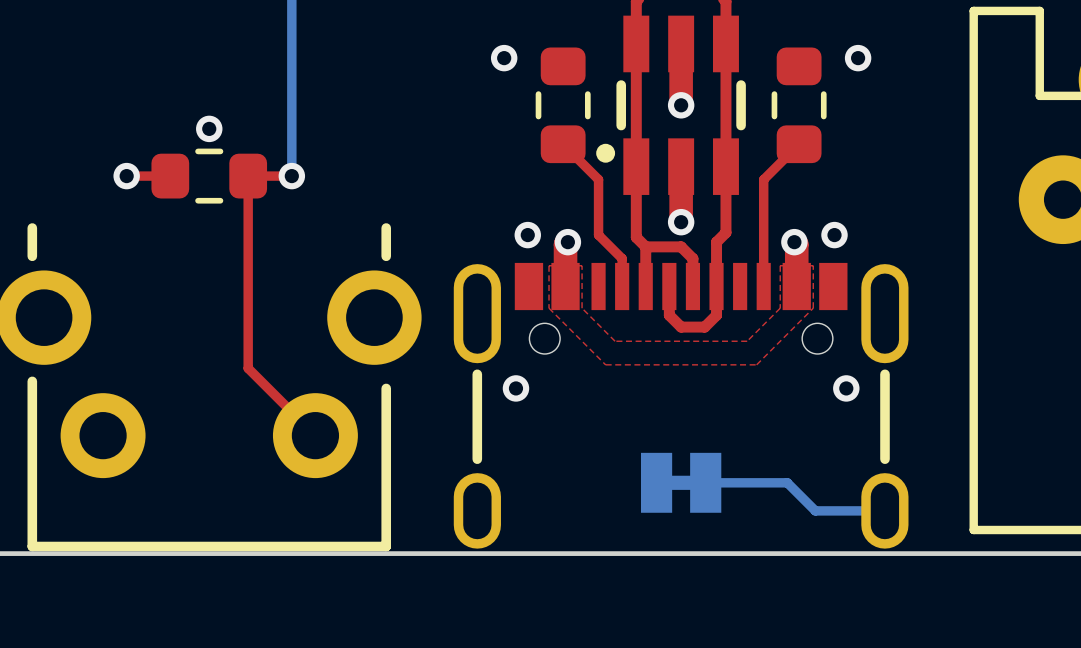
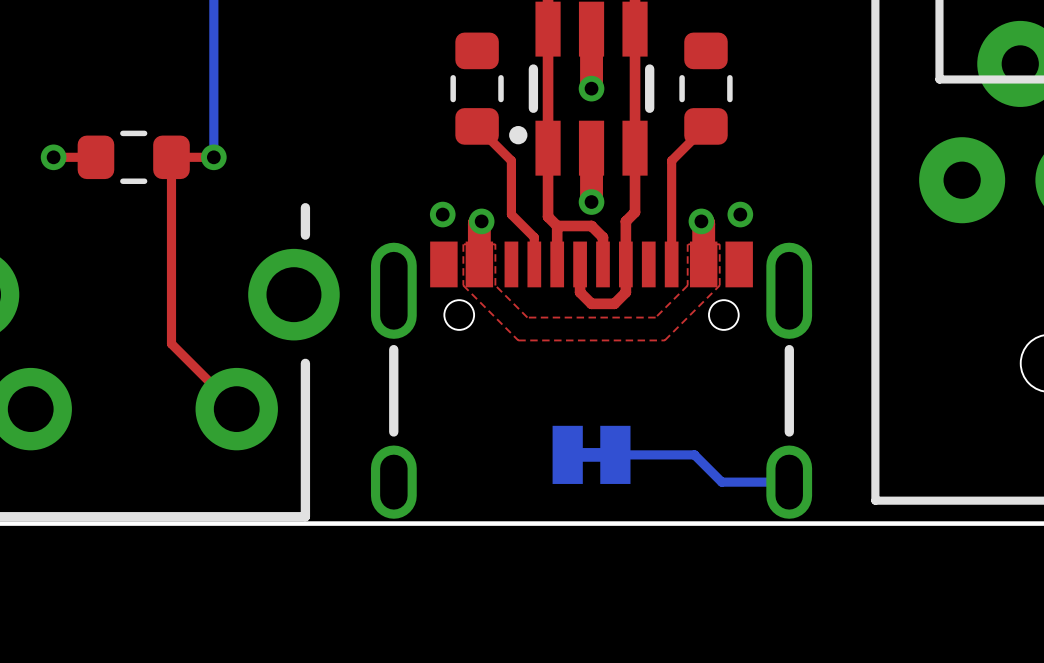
via: (504, 58) -> none
via: (858, 58) -> none
via: (209, 128) -> none
via: (515, 388) -> none
via: (846, 388) -> none

